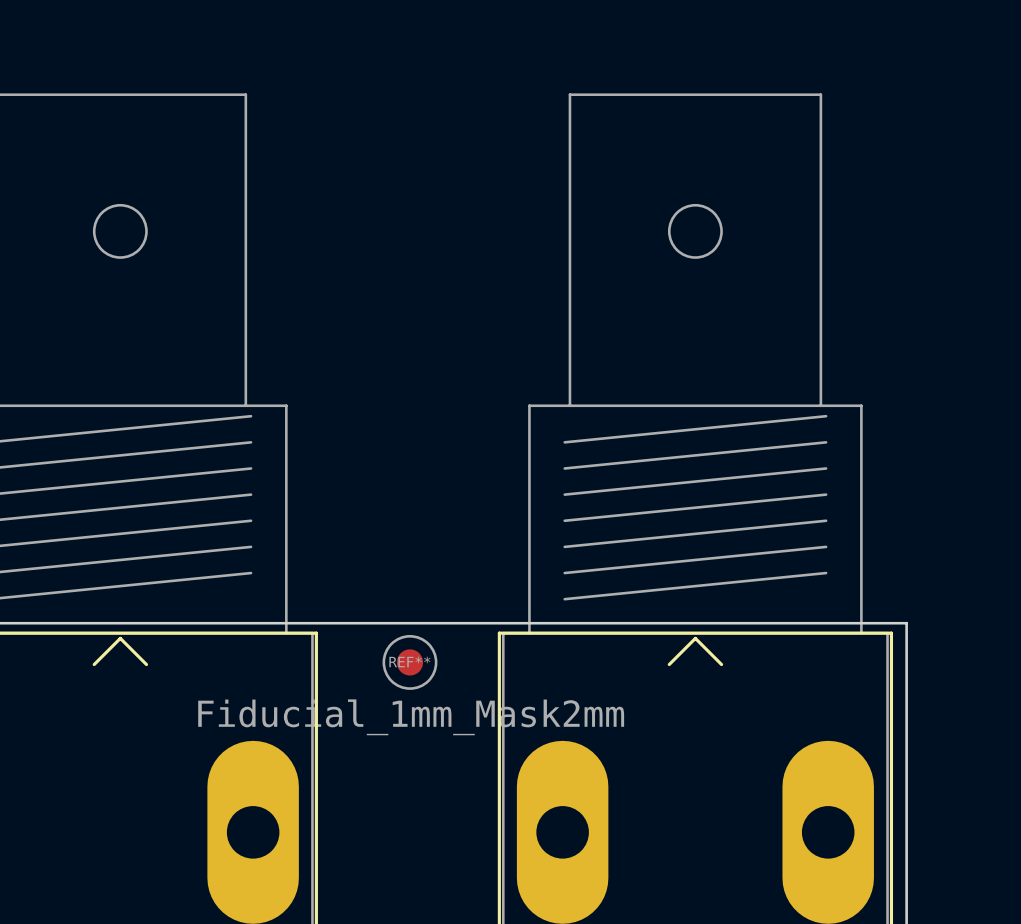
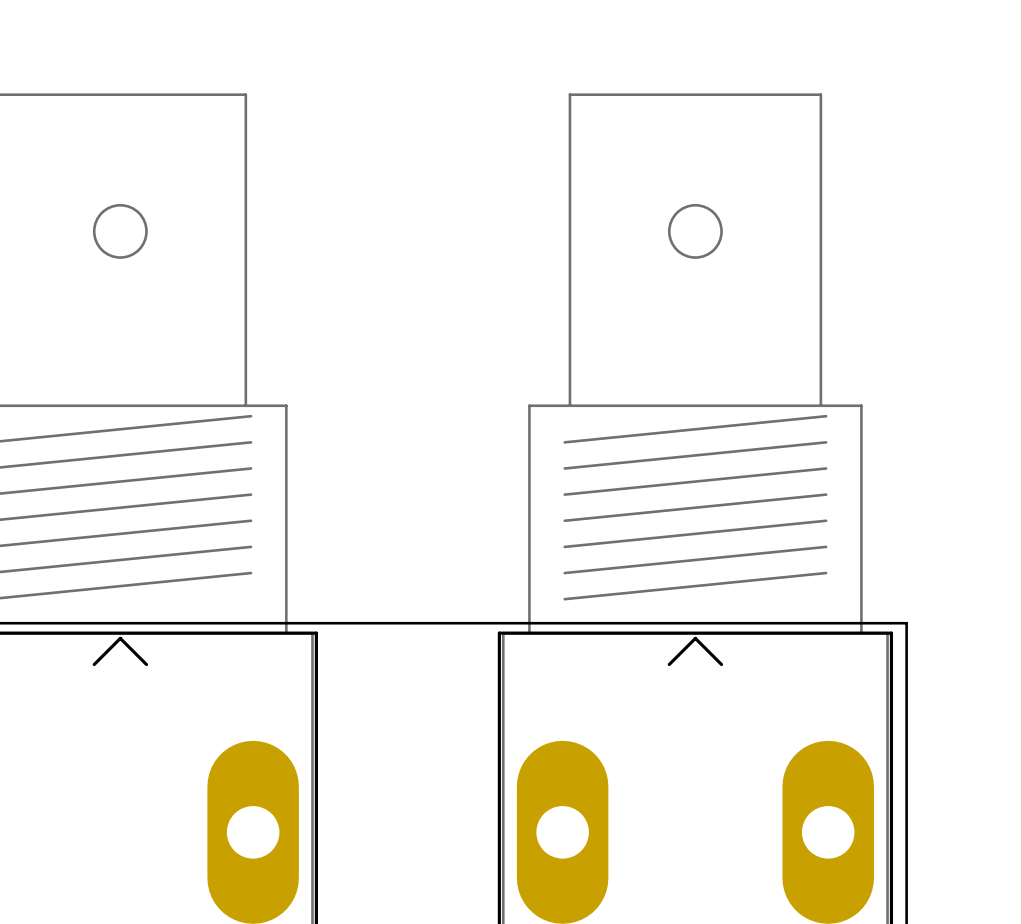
REF**: Fiducial_1mm_Mask2mm (409, 662) -> none

